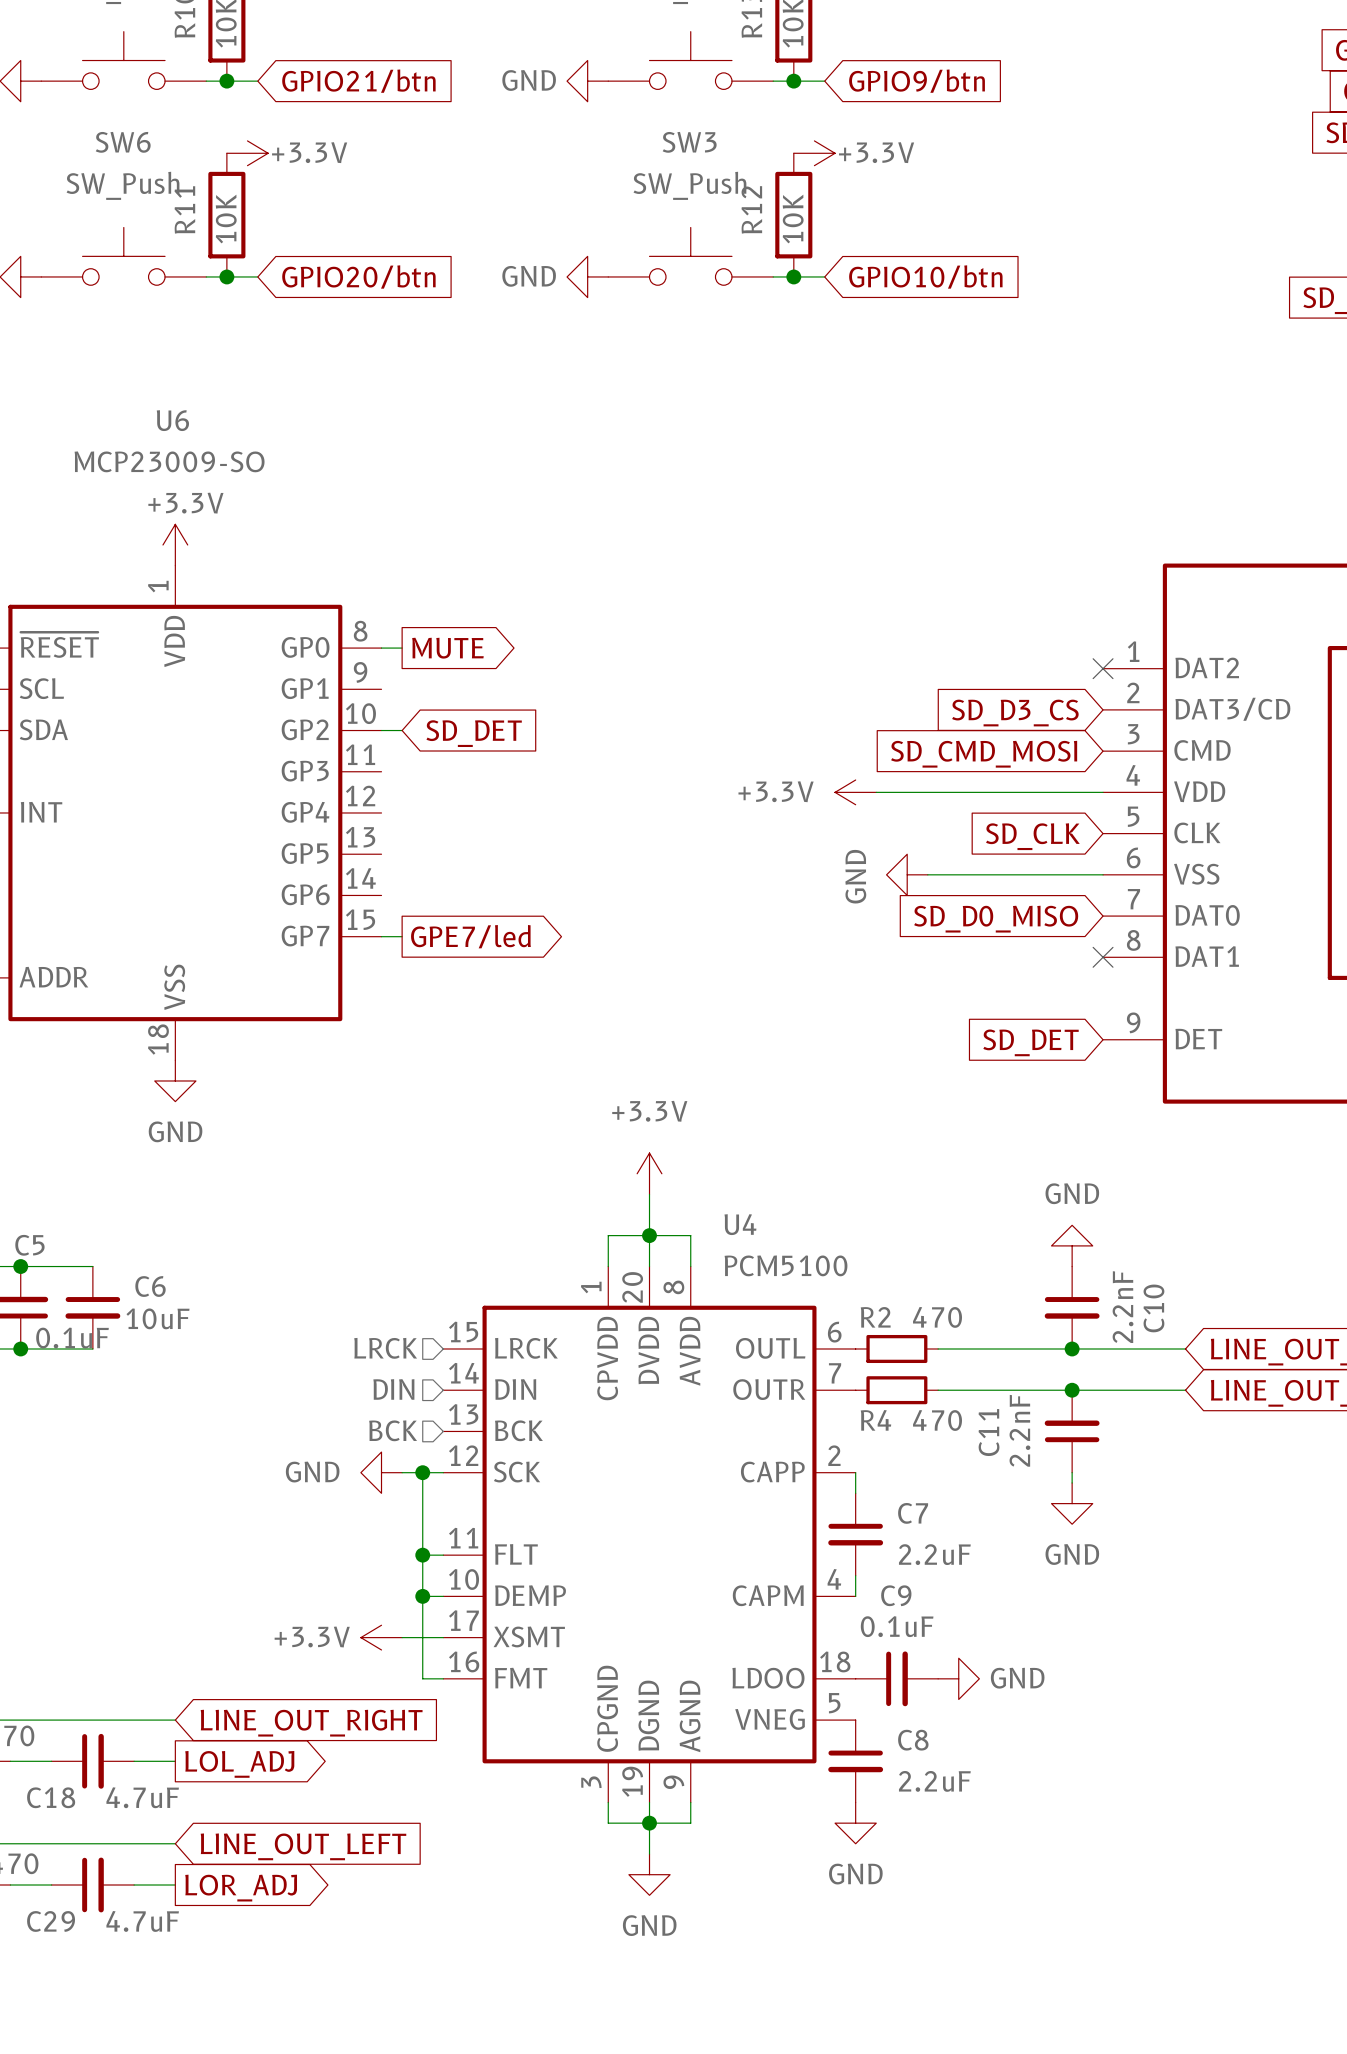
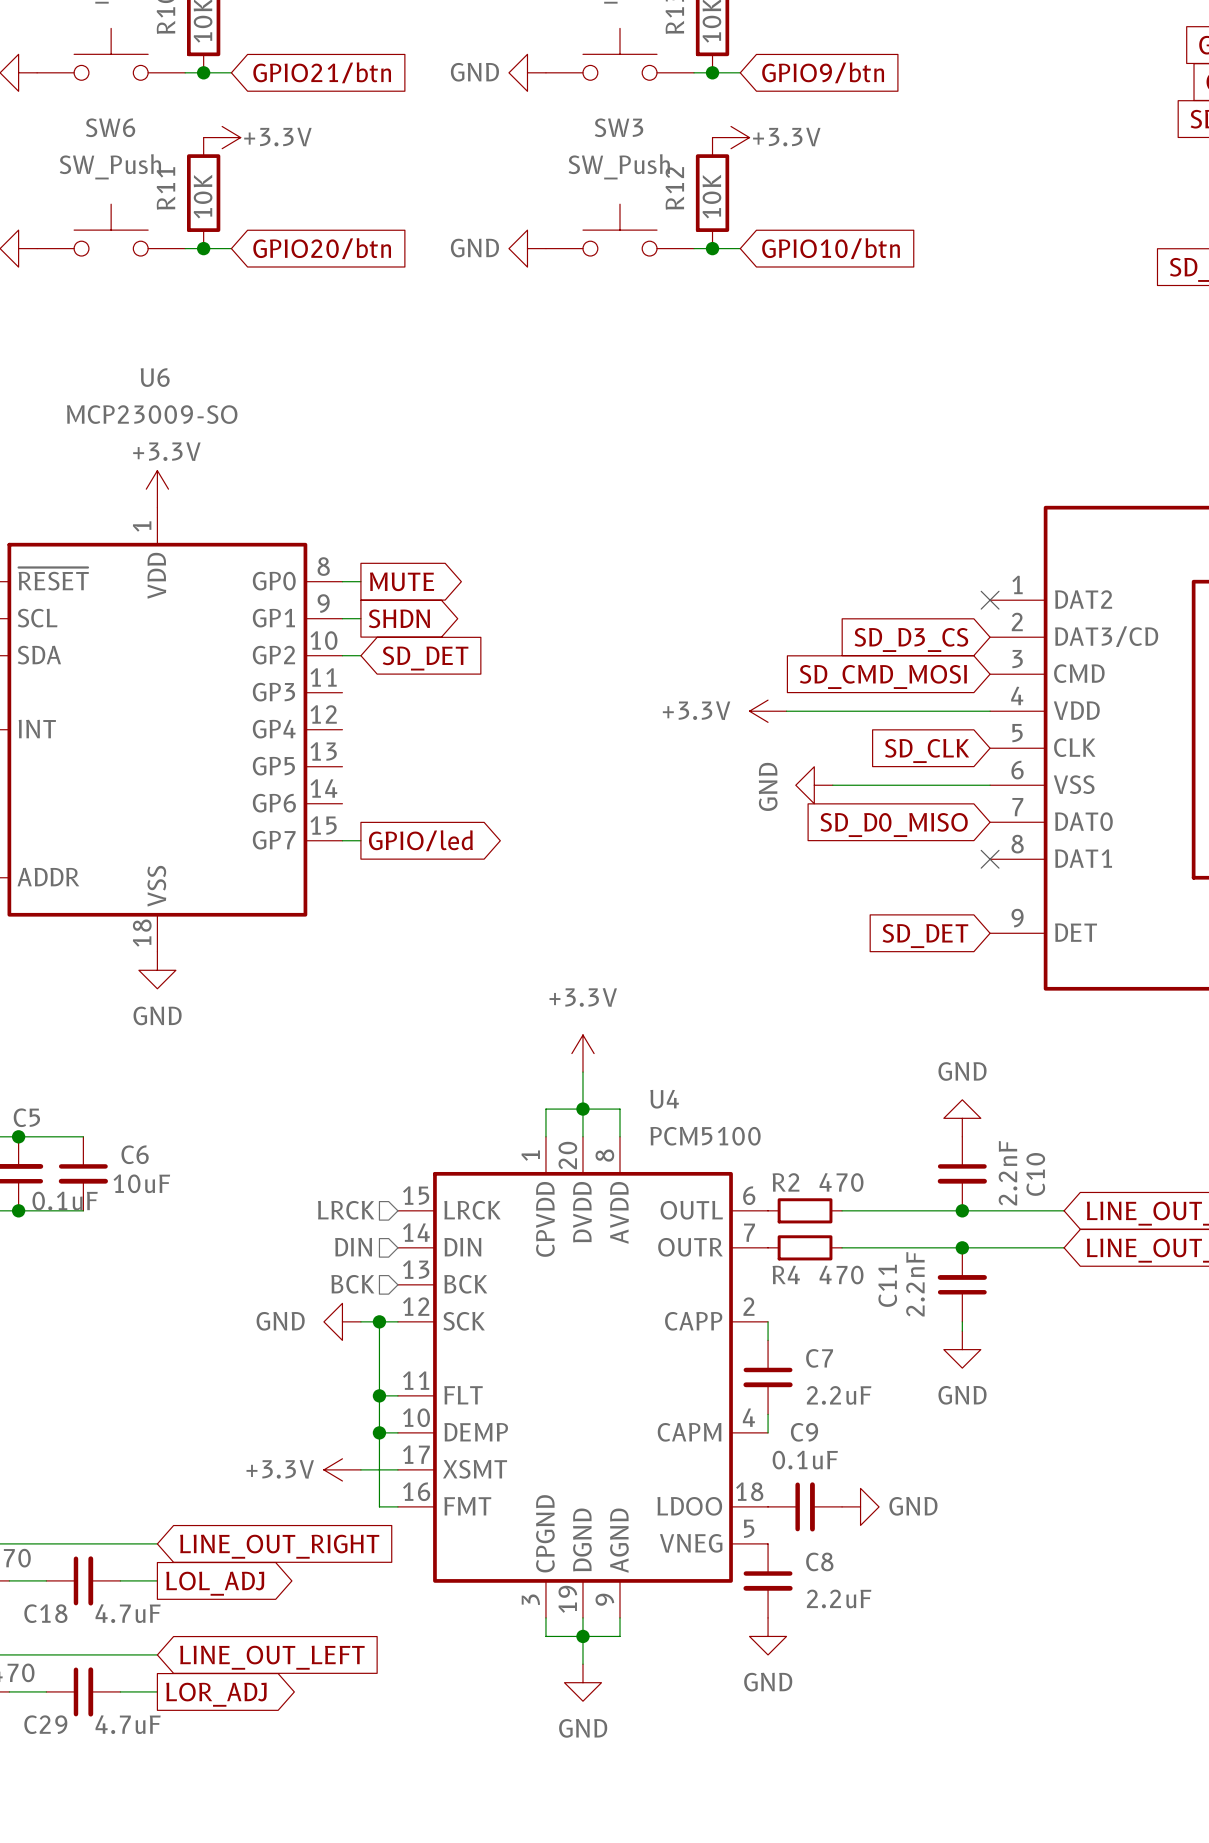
wire: none -> (342, 618) (360, 618)
global label: none -> SHDN (399, 618)
global label: GPE7/led (470, 936) -> GPIO/led (420, 840)

